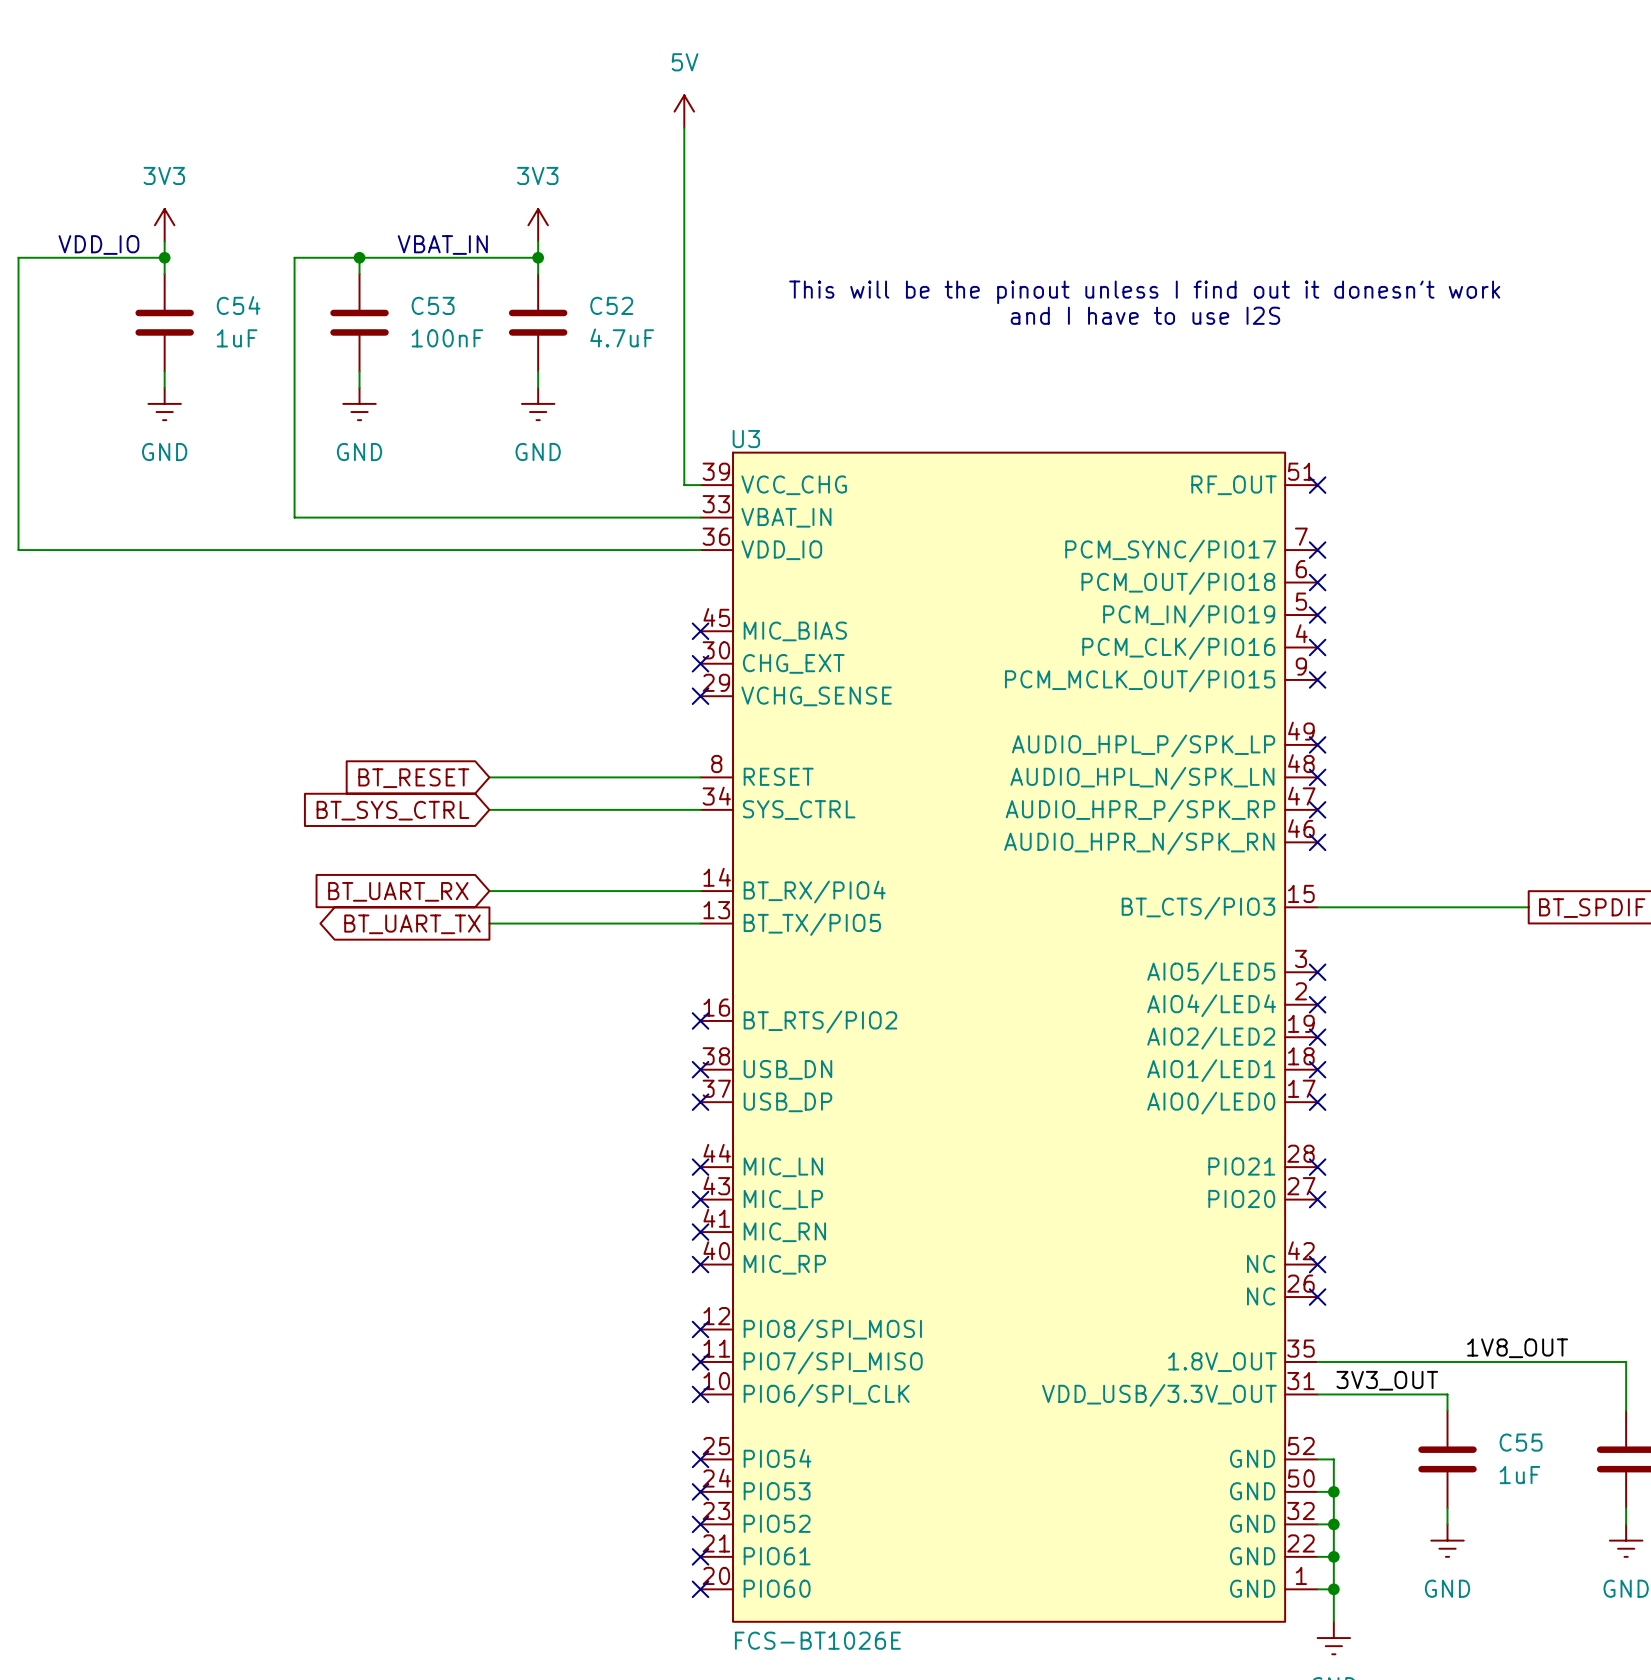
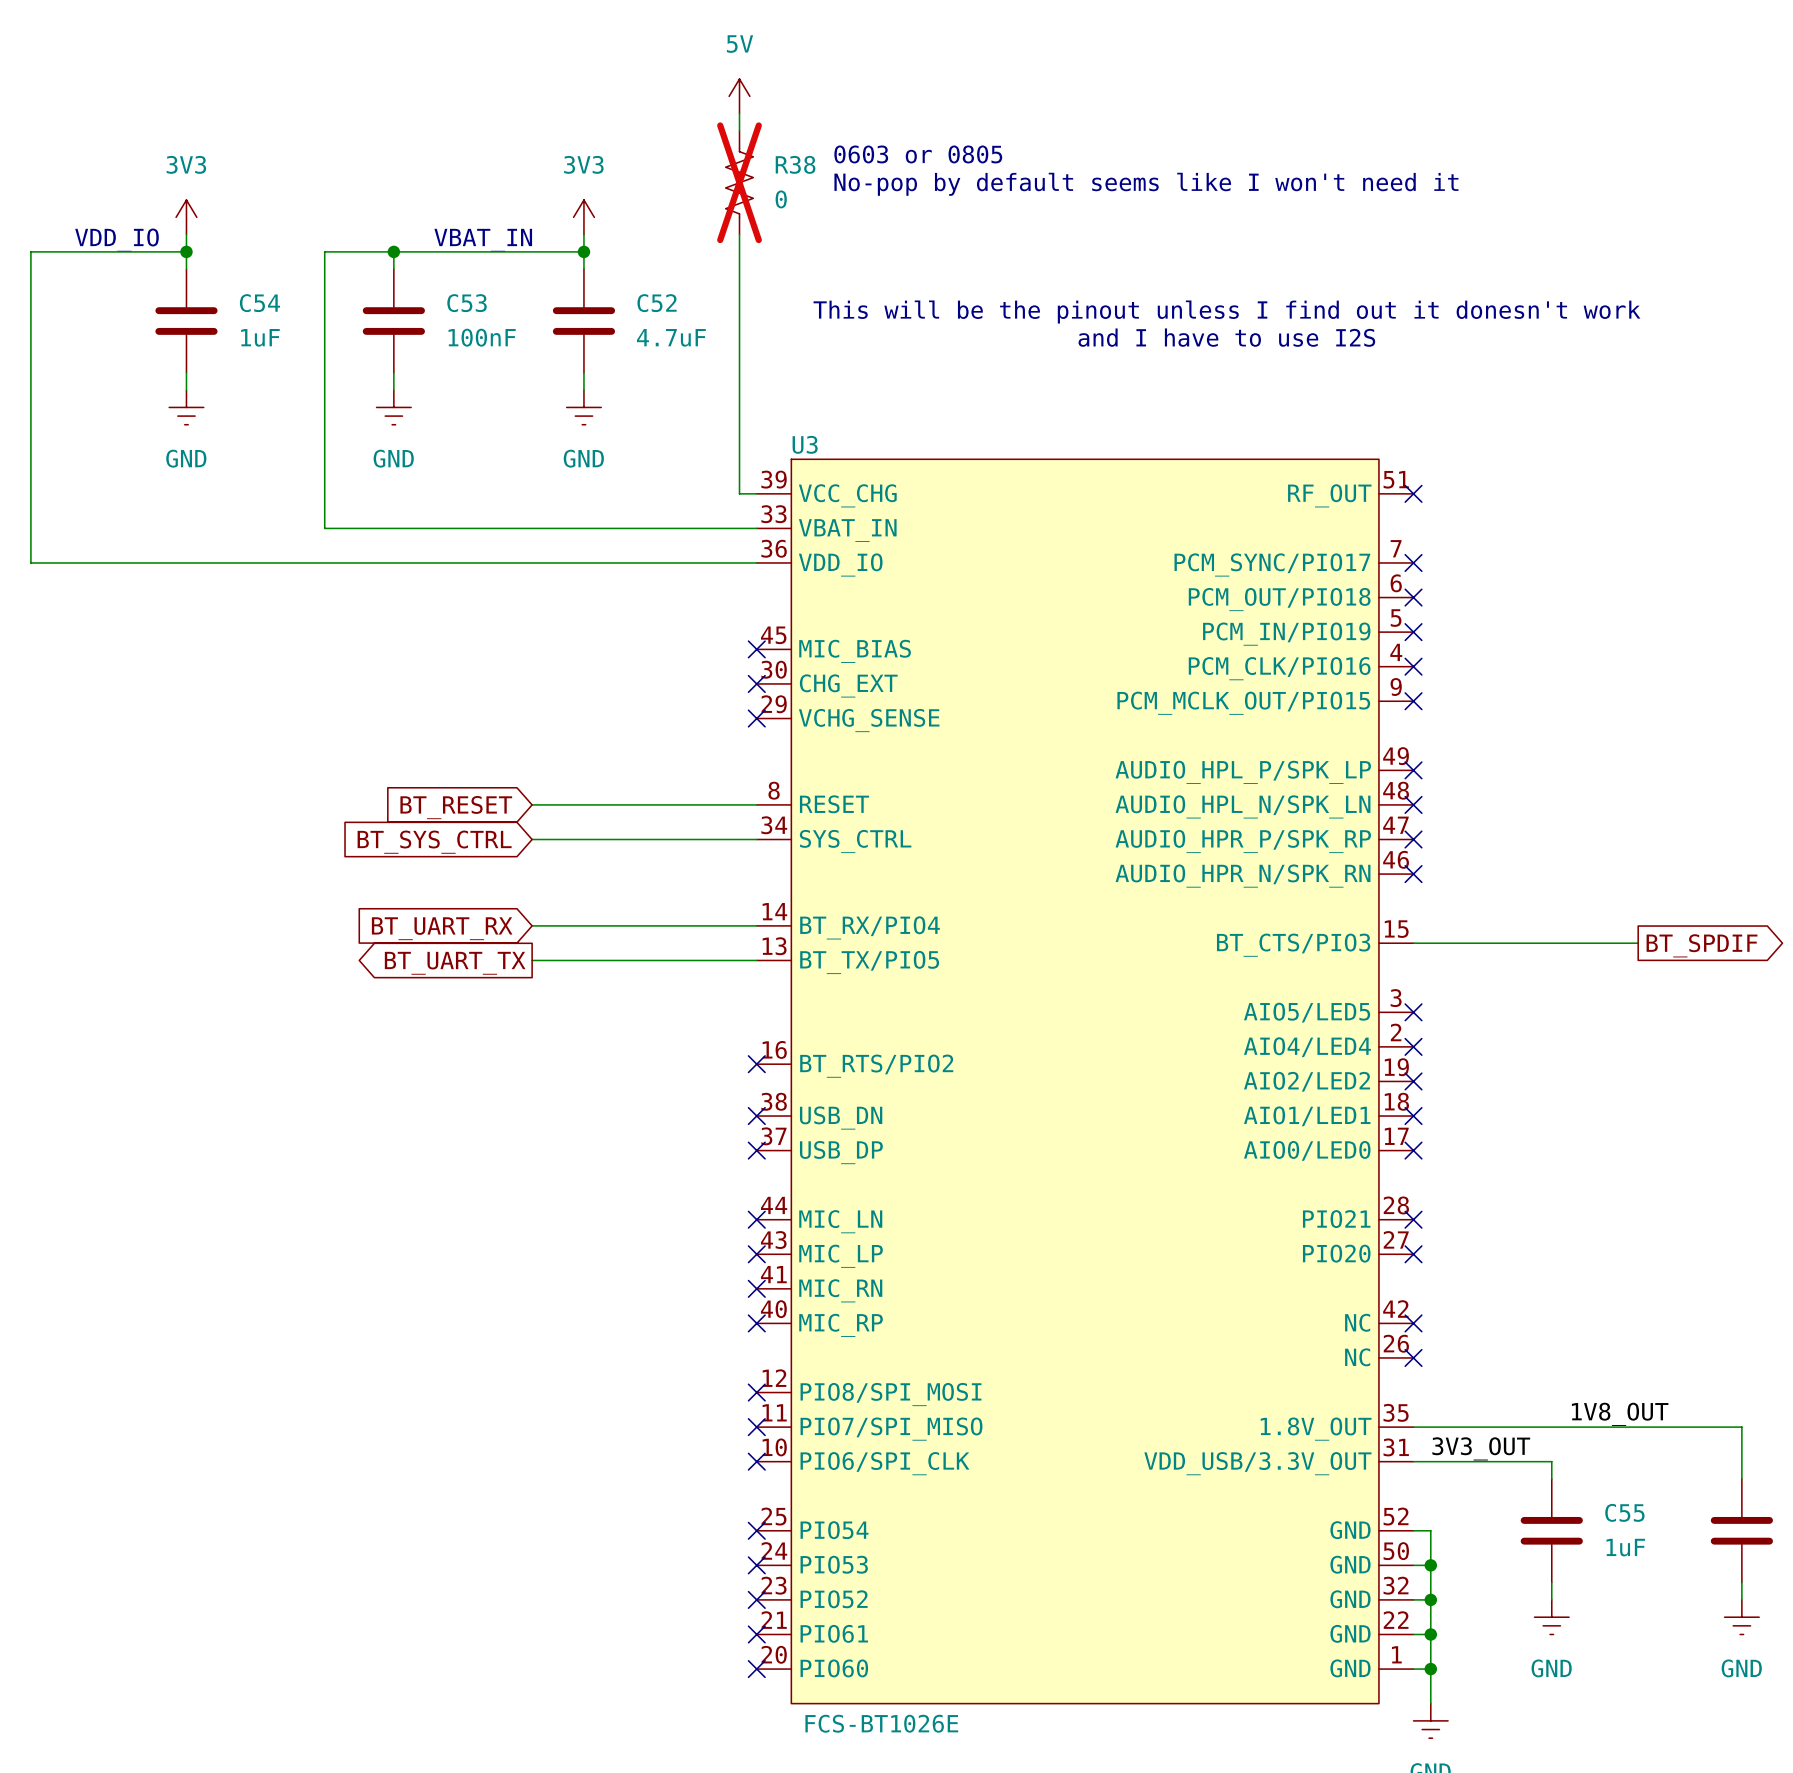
text: none -> 0603 or 0805 (918, 154)
R38: none -> 0 (739, 182)
text: none -> No-pop by default seems like I won't need it (1146, 184)
text: This will be the pinout unless I find out it donesn't work (1144, 292) -> none
text: and I have to use I2S (1145, 315) -> This will be the pinout unless I find out it donesn't work (1226, 312)
text: none -> and I have to use I2S (1226, 337)

